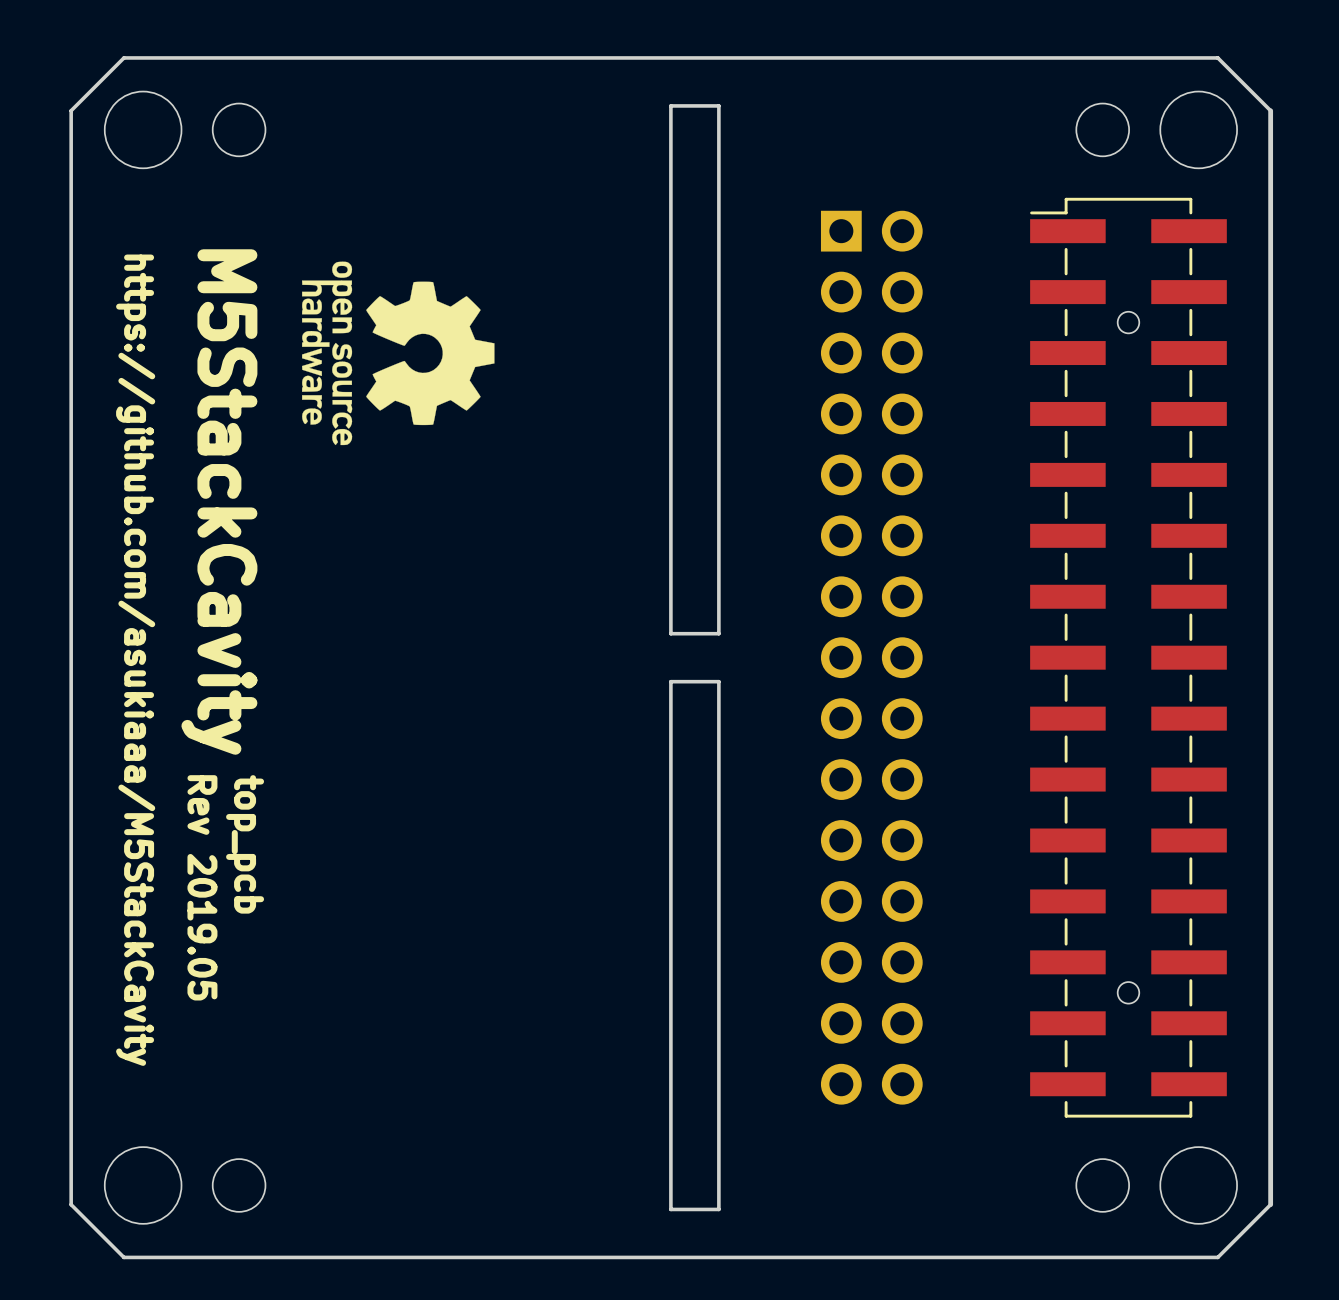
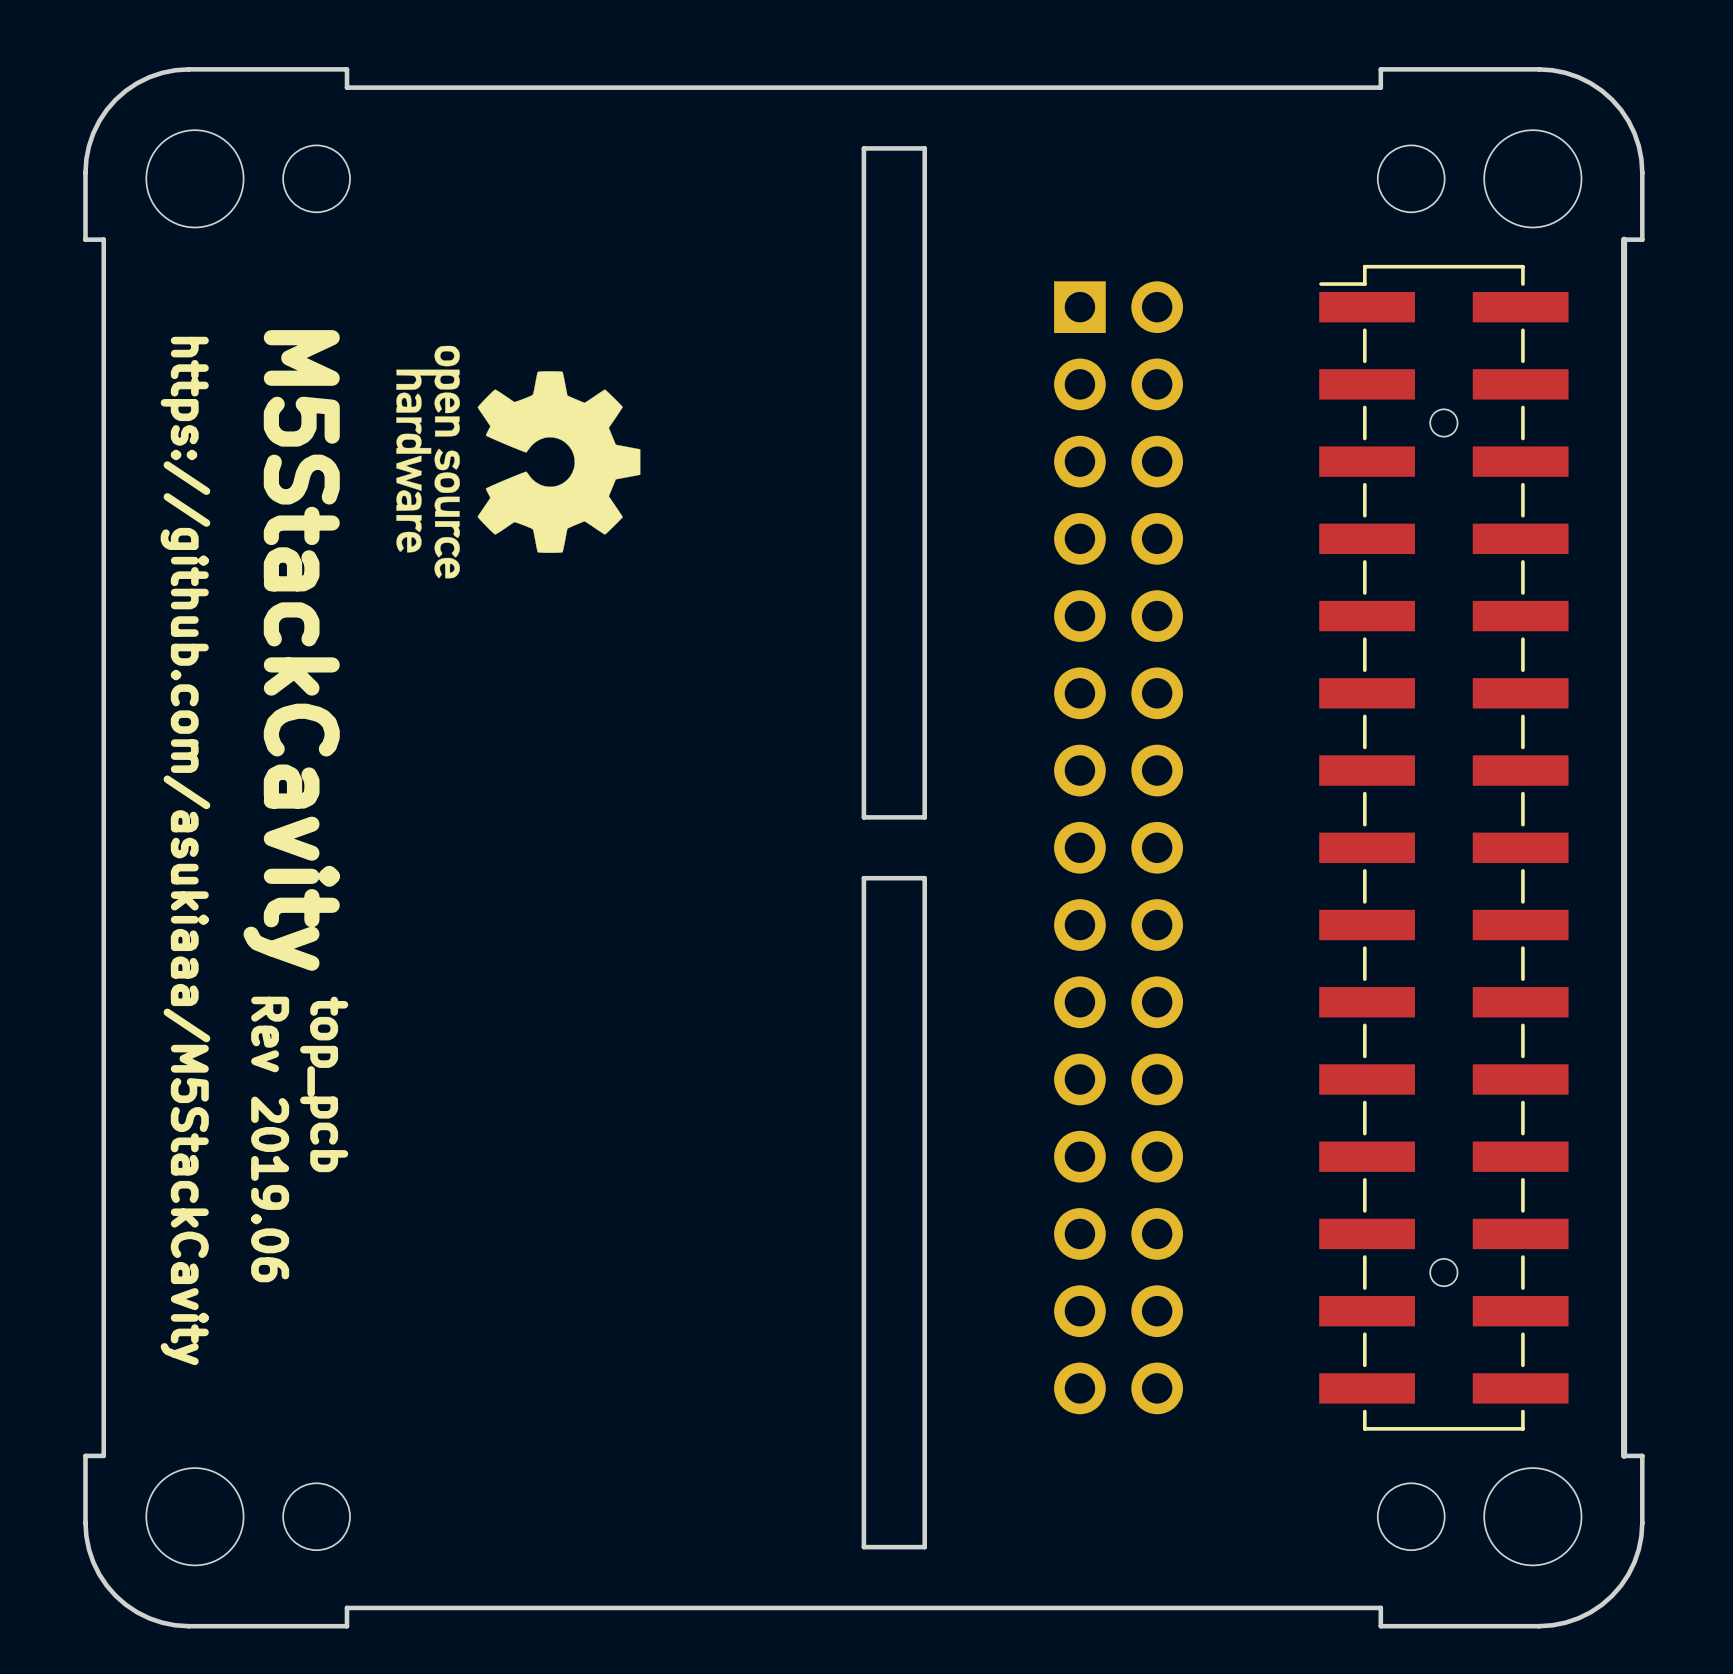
drawing: none -> [83, 67, 350, 242]
drawing: none -> [1378, 67, 1645, 242]
board edge: (263, 57) (123, 57) (71, 110) (71, 177) -> none
board edge: (1078, 57) (1217, 57) (1270, 110) (1270, 177) -> none
text: Rev 2019.05 (202, 887) -> Rev 2019.06 (270, 1139)
drawing: none -> [83, 1453, 350, 1629]
drawing: none -> [1378, 1453, 1645, 1629]
board edge: (71, 1137) (71, 1204) (123, 1257) (263, 1257) -> none
board edge: (1270, 1137) (1270, 1204) (1217, 1257) (1078, 1257) -> none

